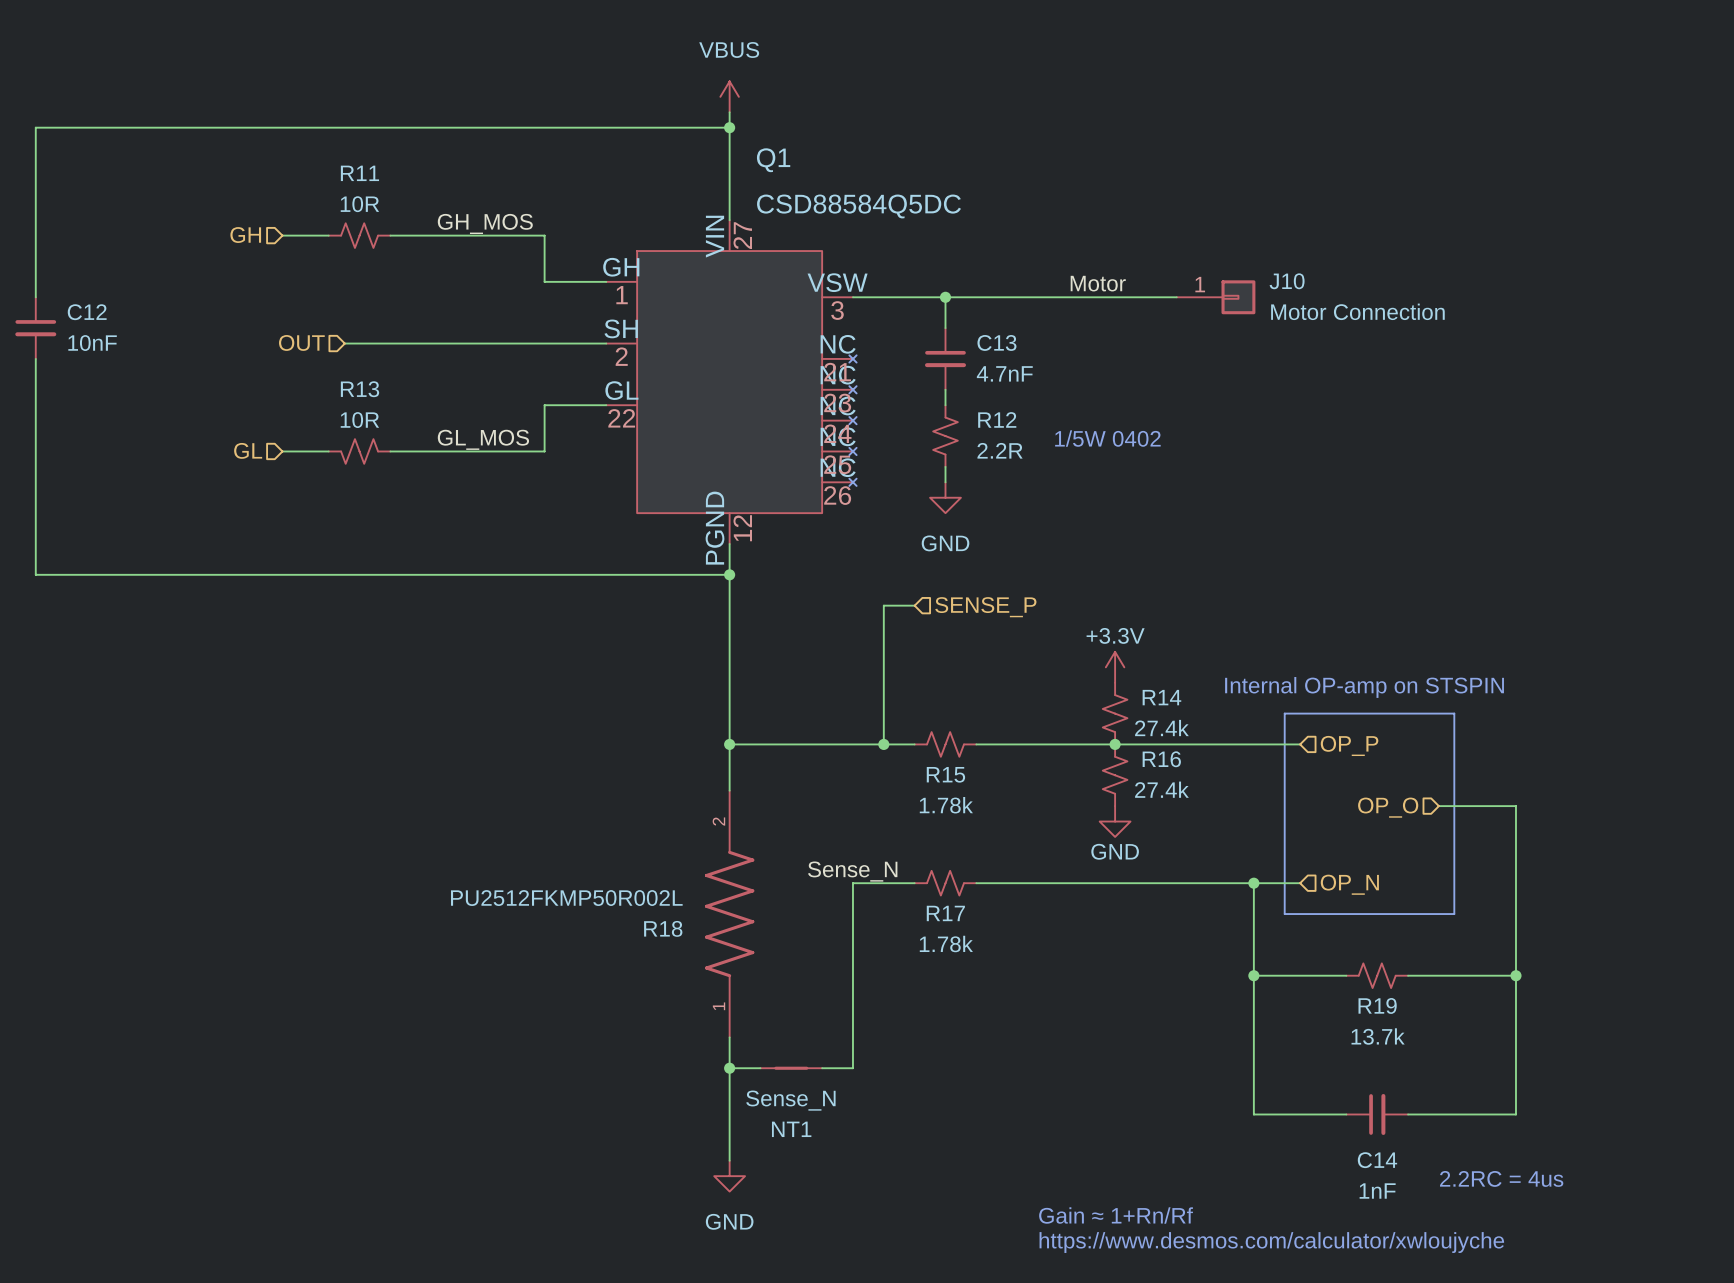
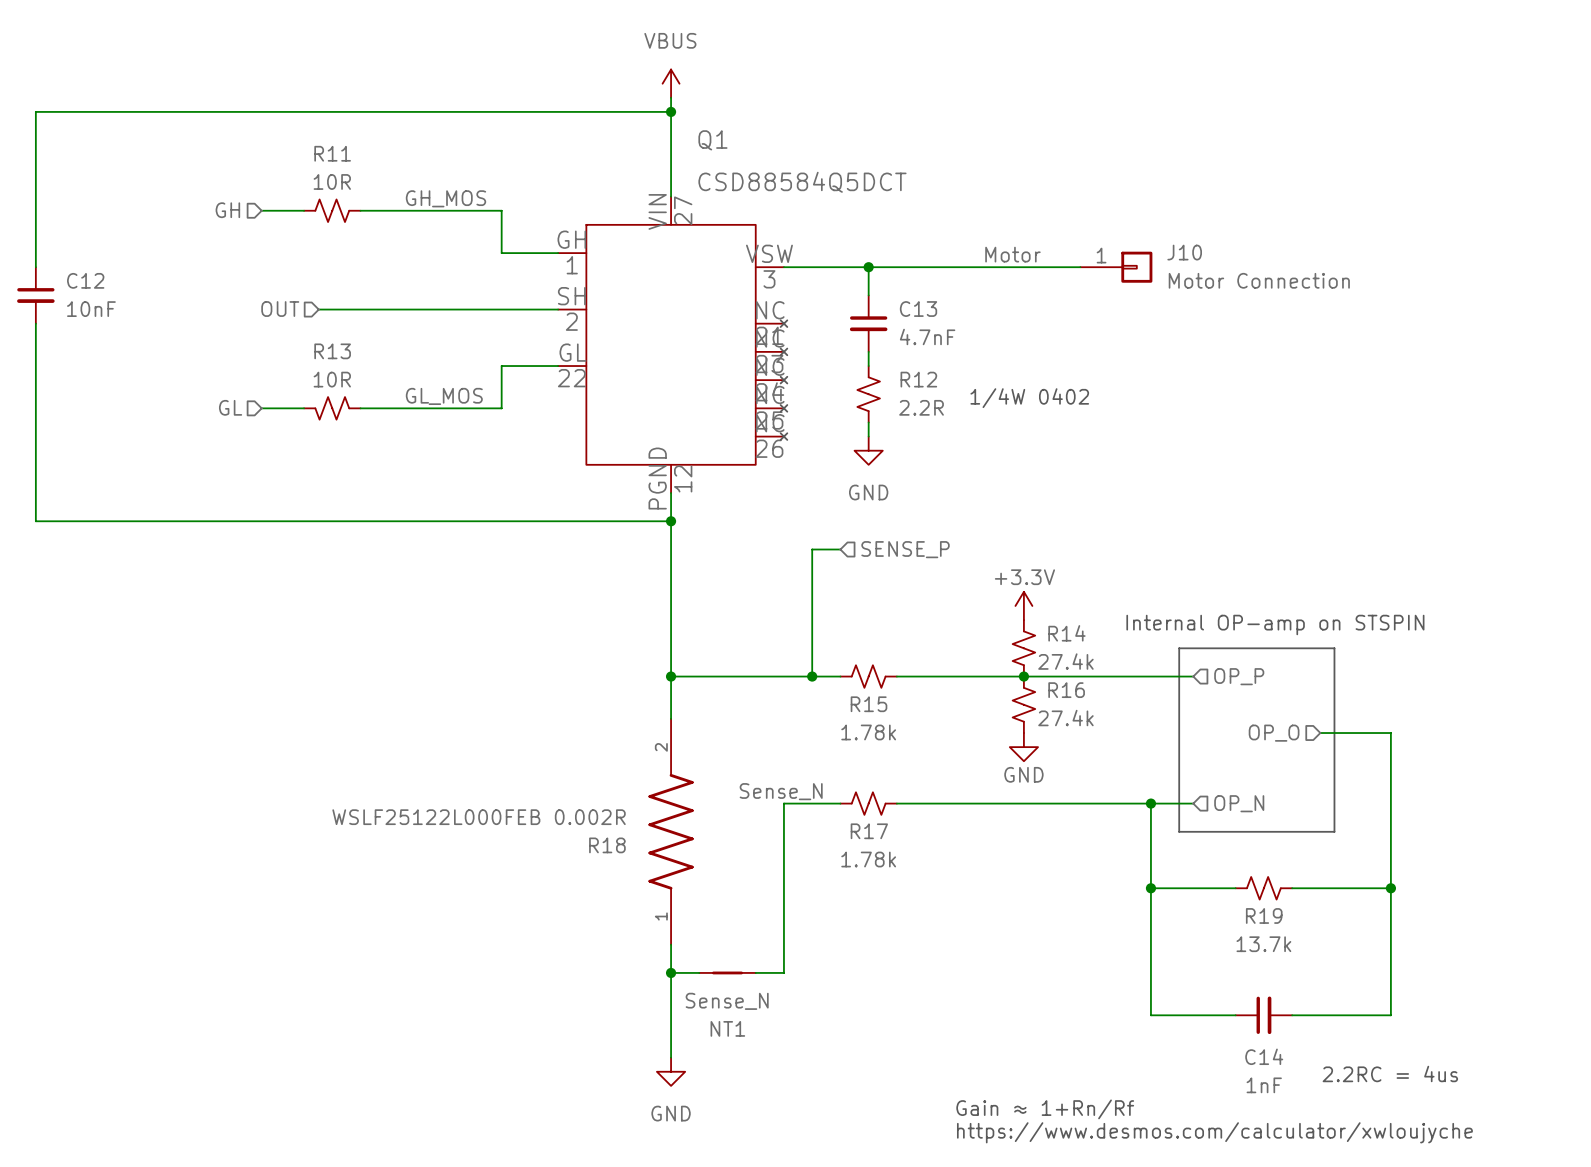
Q1 value: CSD88584Q5DC (858, 206) -> CSD88584Q5DCT (802, 182)
text: 1/5W 0402 (1107, 438) -> 1/4W 0402 (1029, 398)
R18 value: PU2512FKMP50R002L (566, 898) -> WSLF25122L000FEB 0.002R (479, 817)

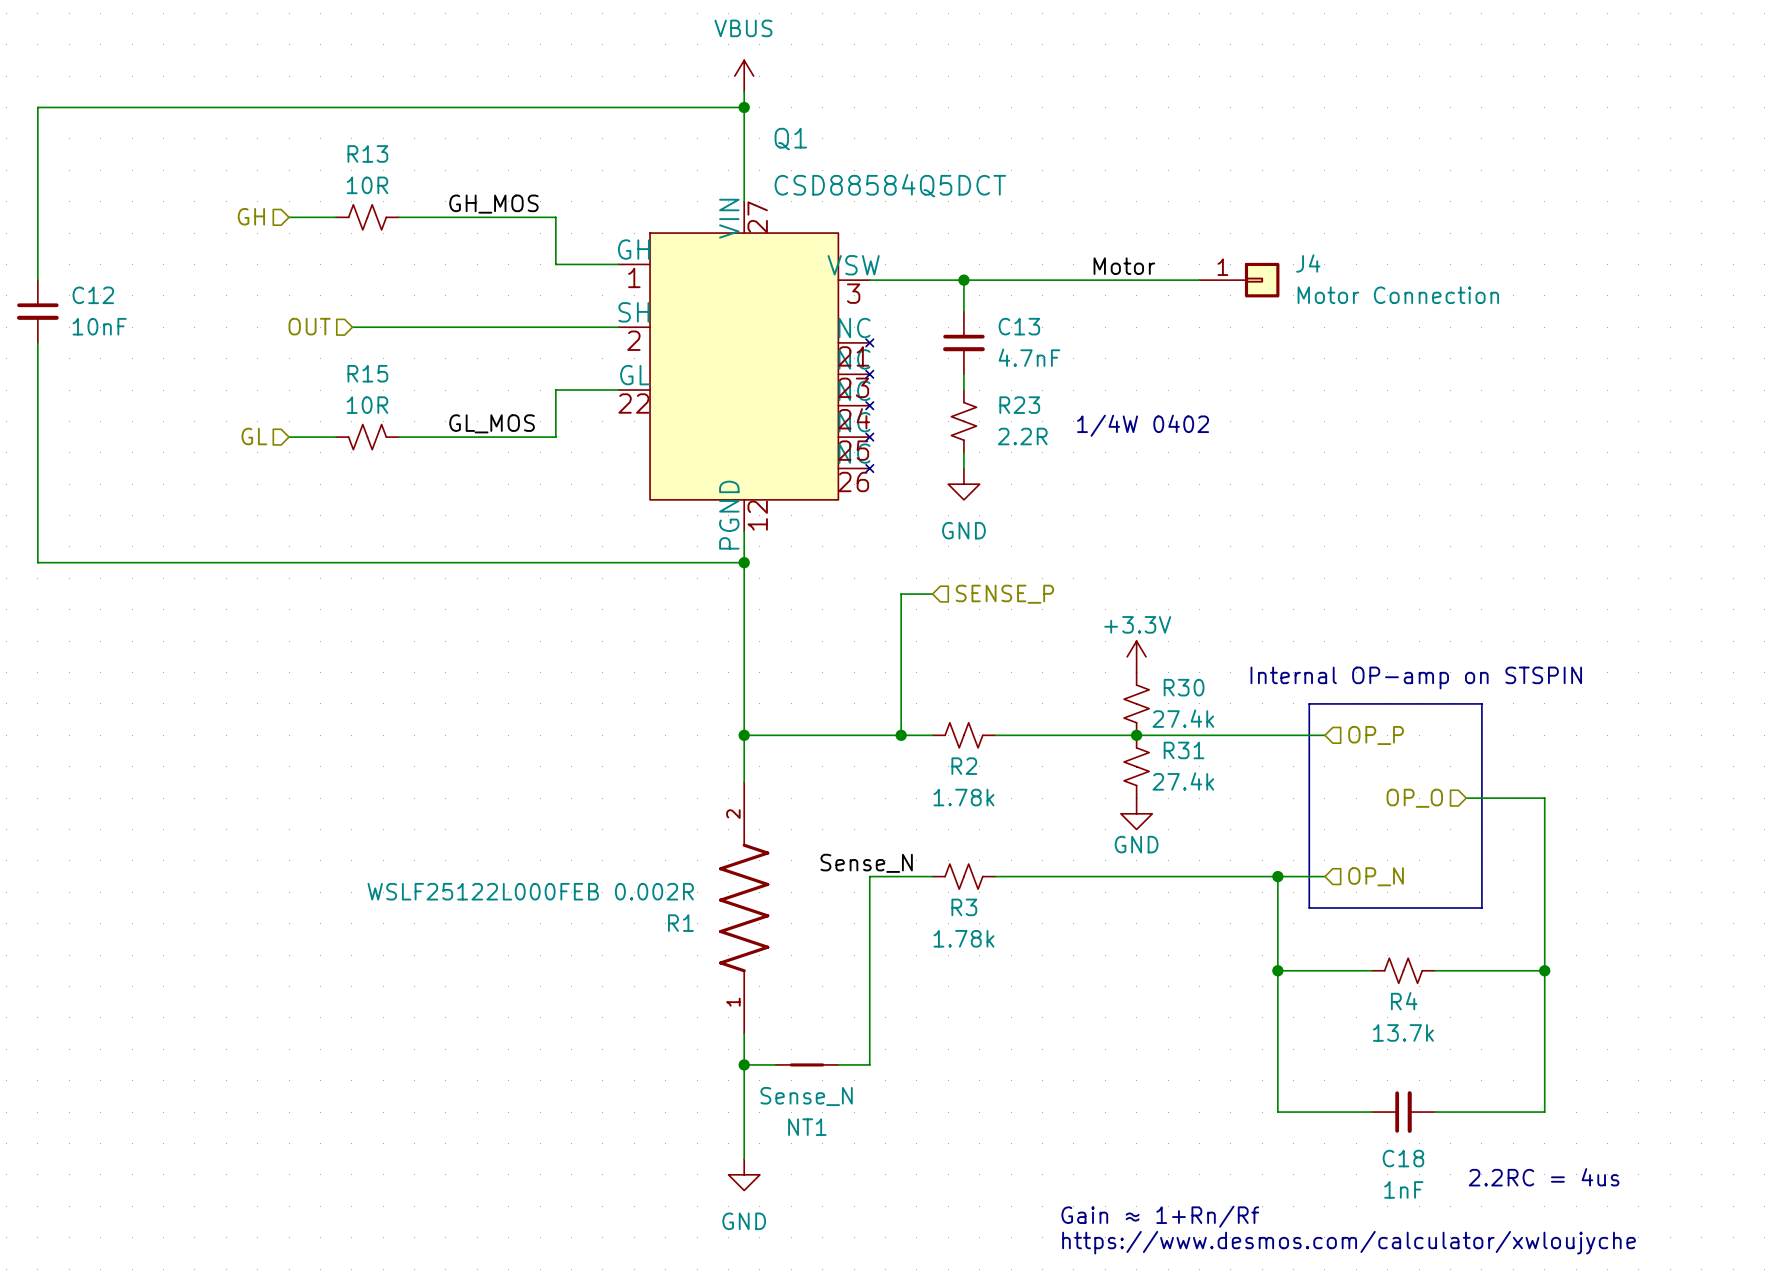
R11 name: R11 (332, 153) -> R13 (367, 153)
J10 name: J10 (1184, 252) -> J4 (1308, 263)
R13 name: R13 (332, 351) -> R15 (367, 373)
R12 name: R12 (918, 379) -> R23 (1019, 405)
R14 name: R14 (1066, 633) -> R30 (1184, 687)
R16 name: R16 (1066, 690) -> R31 (1184, 750)
R15 name: R15 (869, 704) -> R2 (964, 766)
R17 name: R17 (869, 831) -> R3 (964, 907)
R18 name: R18 (607, 845) -> R1 (680, 923)
R19 name: R19 (1264, 915) -> R4 (1404, 1001)
C14 name: C14 (1264, 1056) -> C18 (1403, 1158)

